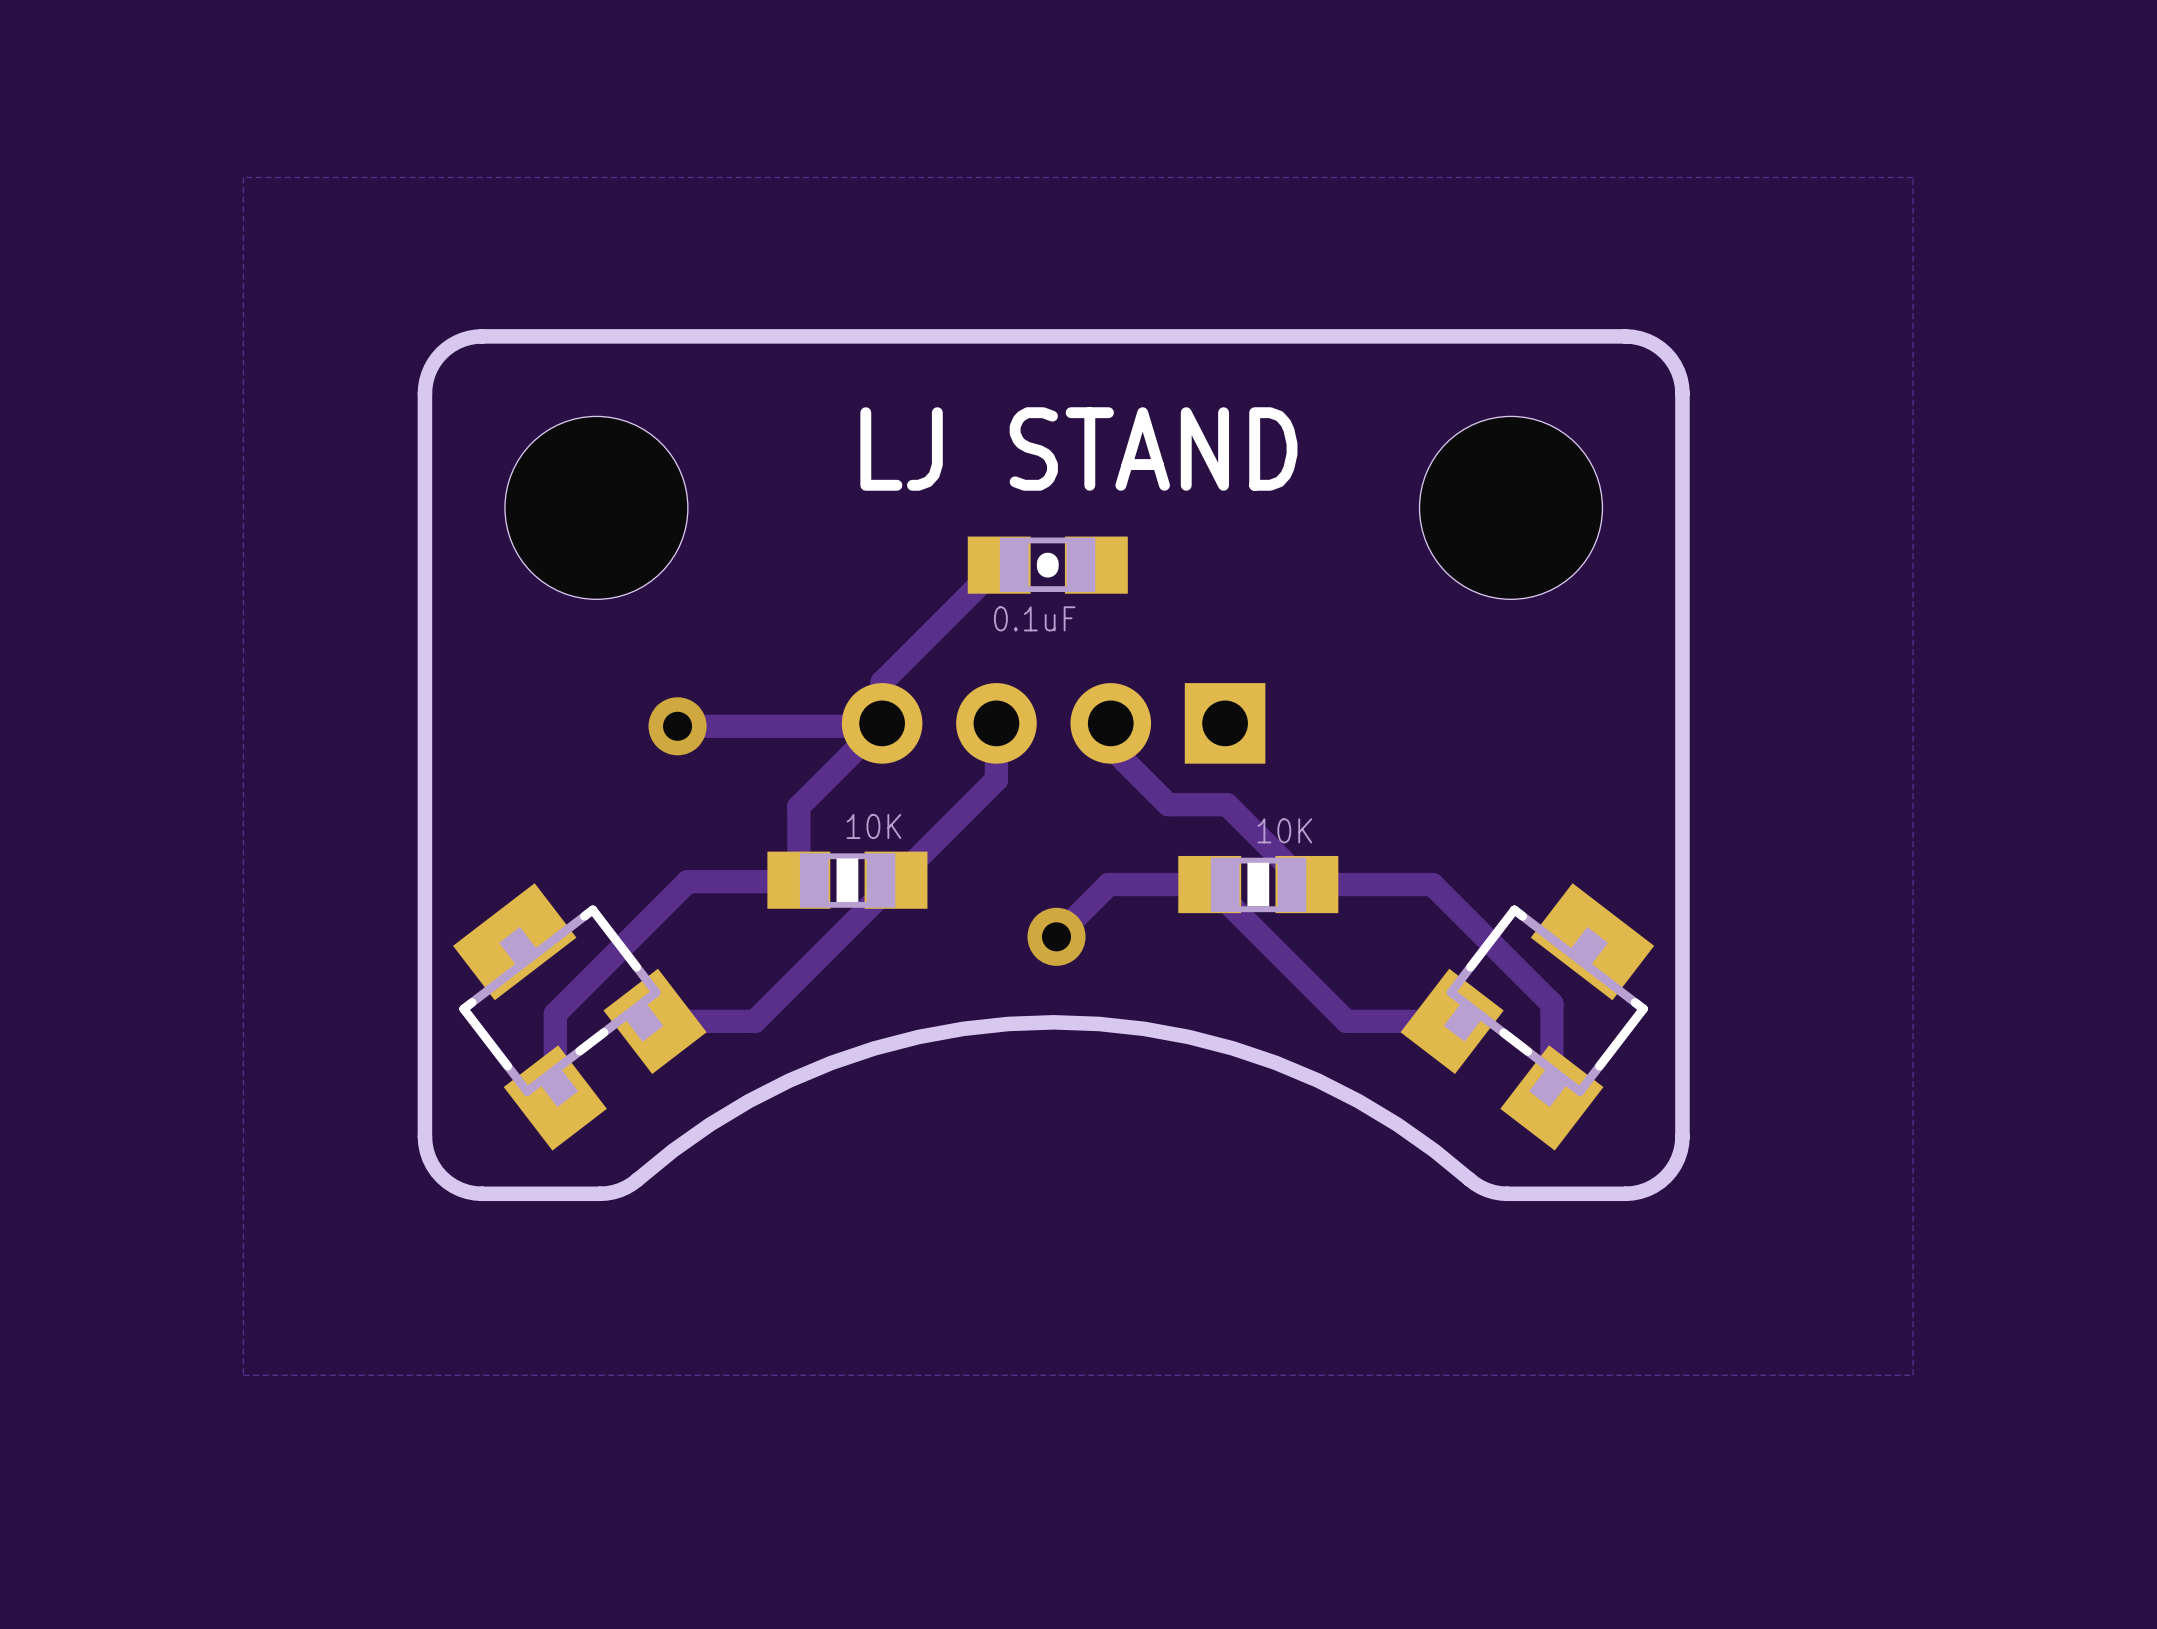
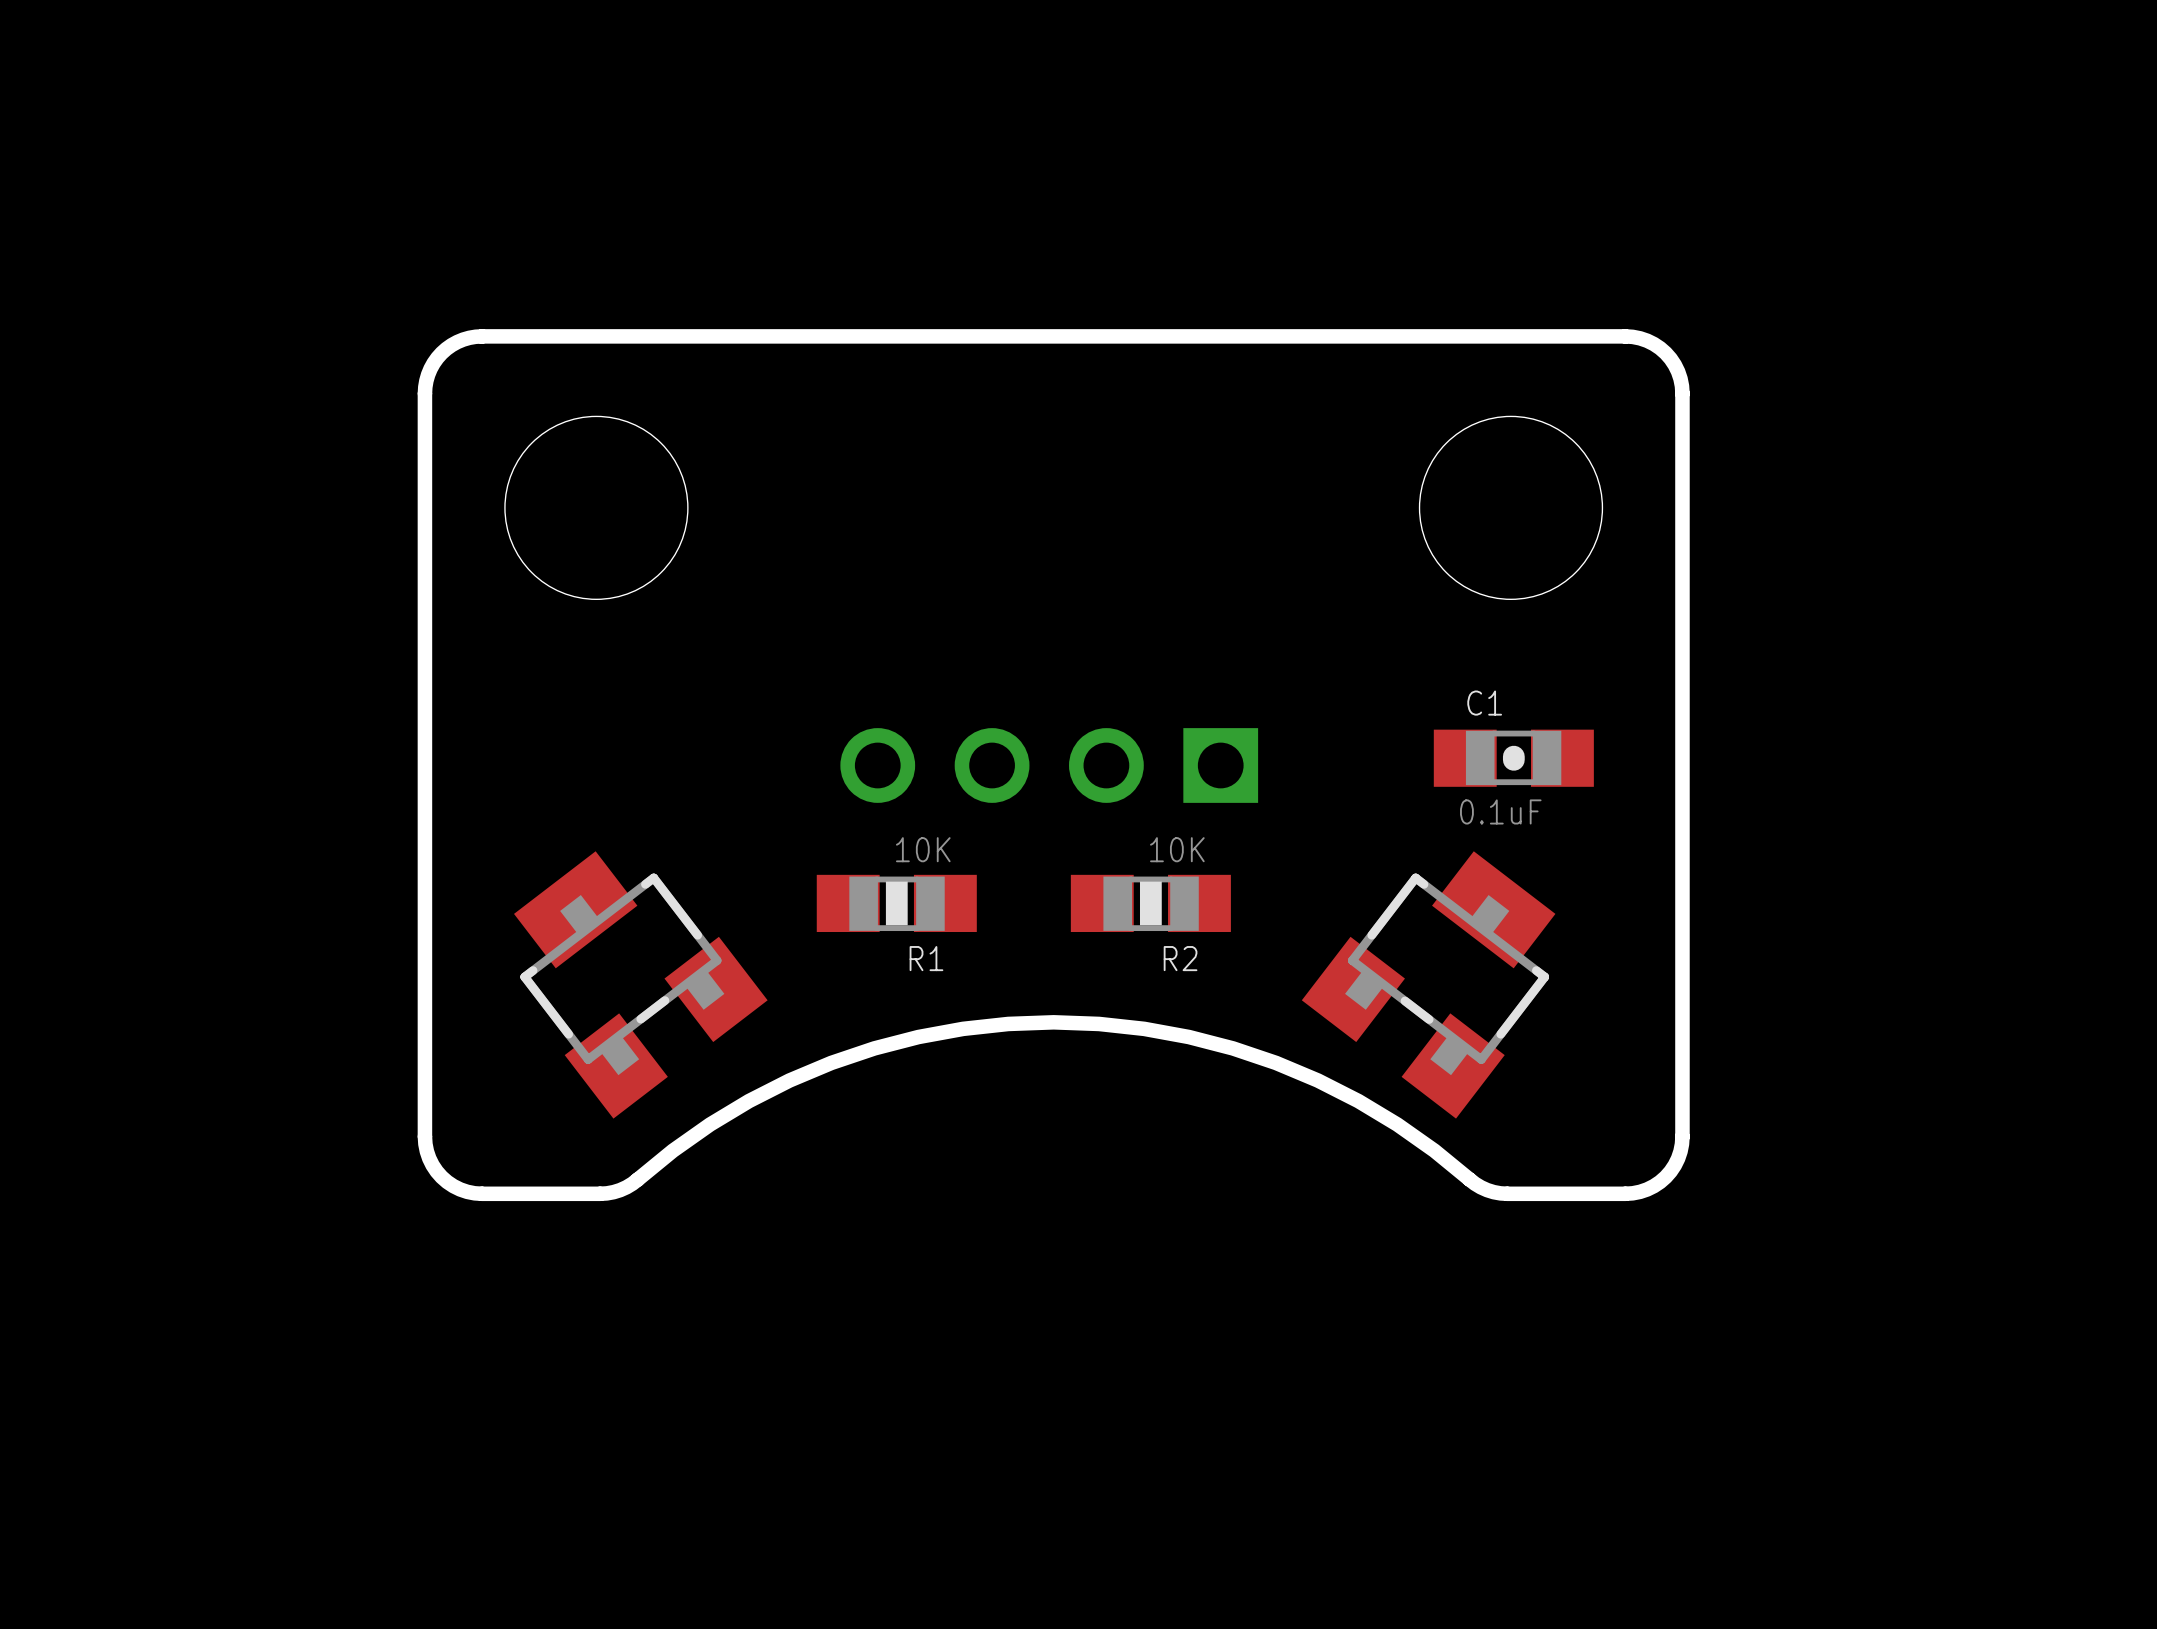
zone outline: (243, 177) (243, 1375) (1913, 1375) (1913, 177) (243, 177) -> none
text: LJ STAND (1078, 448) -> none
track: (999, 565) (882, 682) (882, 723) (798, 806) (798, 880) (687, 881) (555, 1014) (555, 1097) -> none
part: 0.1uF (1047, 565) -> none
part footprint: [841, 683, 1266, 764] -> [840, 728, 1259, 803]
track: (996, 723) (996, 779) (754, 1021) (655, 1021) -> none
track: (1110, 723) (1110, 747) (1168, 804) (1227, 804) (1306, 884) (1432, 884) (1551, 1003) (1551, 1097) -> none
track: (677, 726) (879, 726) -> none
via: (677, 726) -> none
C1: none -> 0.1uF (1513, 758)
R1 position: (847, 880) -> (896, 903)
part: 10K (1258, 884) -> none
R2: none -> 10K (1150, 903)
track: (1056, 936) (1108, 884) (1209, 884) (1346, 1021) (1452, 1021) -> none
via: (1056, 936) -> none
R1 name: none -> R1 (926, 958)
part position: (579, 1016) -> (640, 984)
part position: (1527, 1016) -> (1428, 984)

